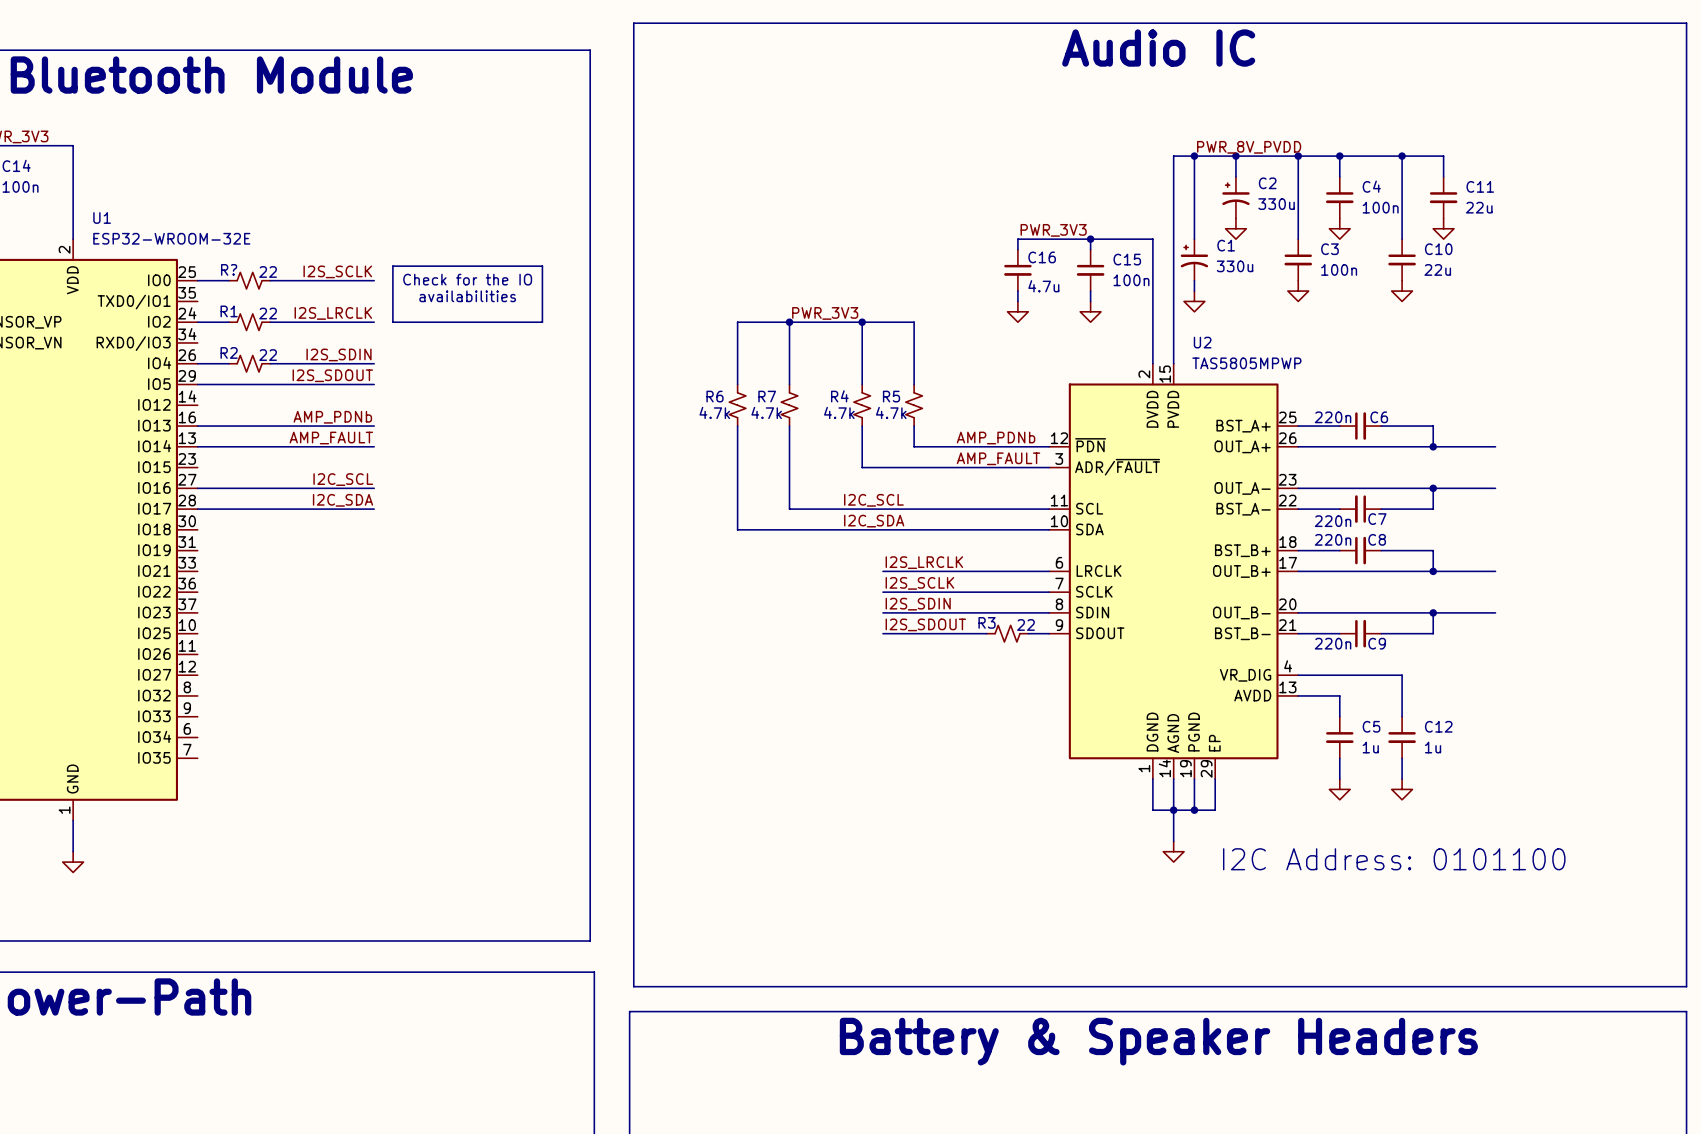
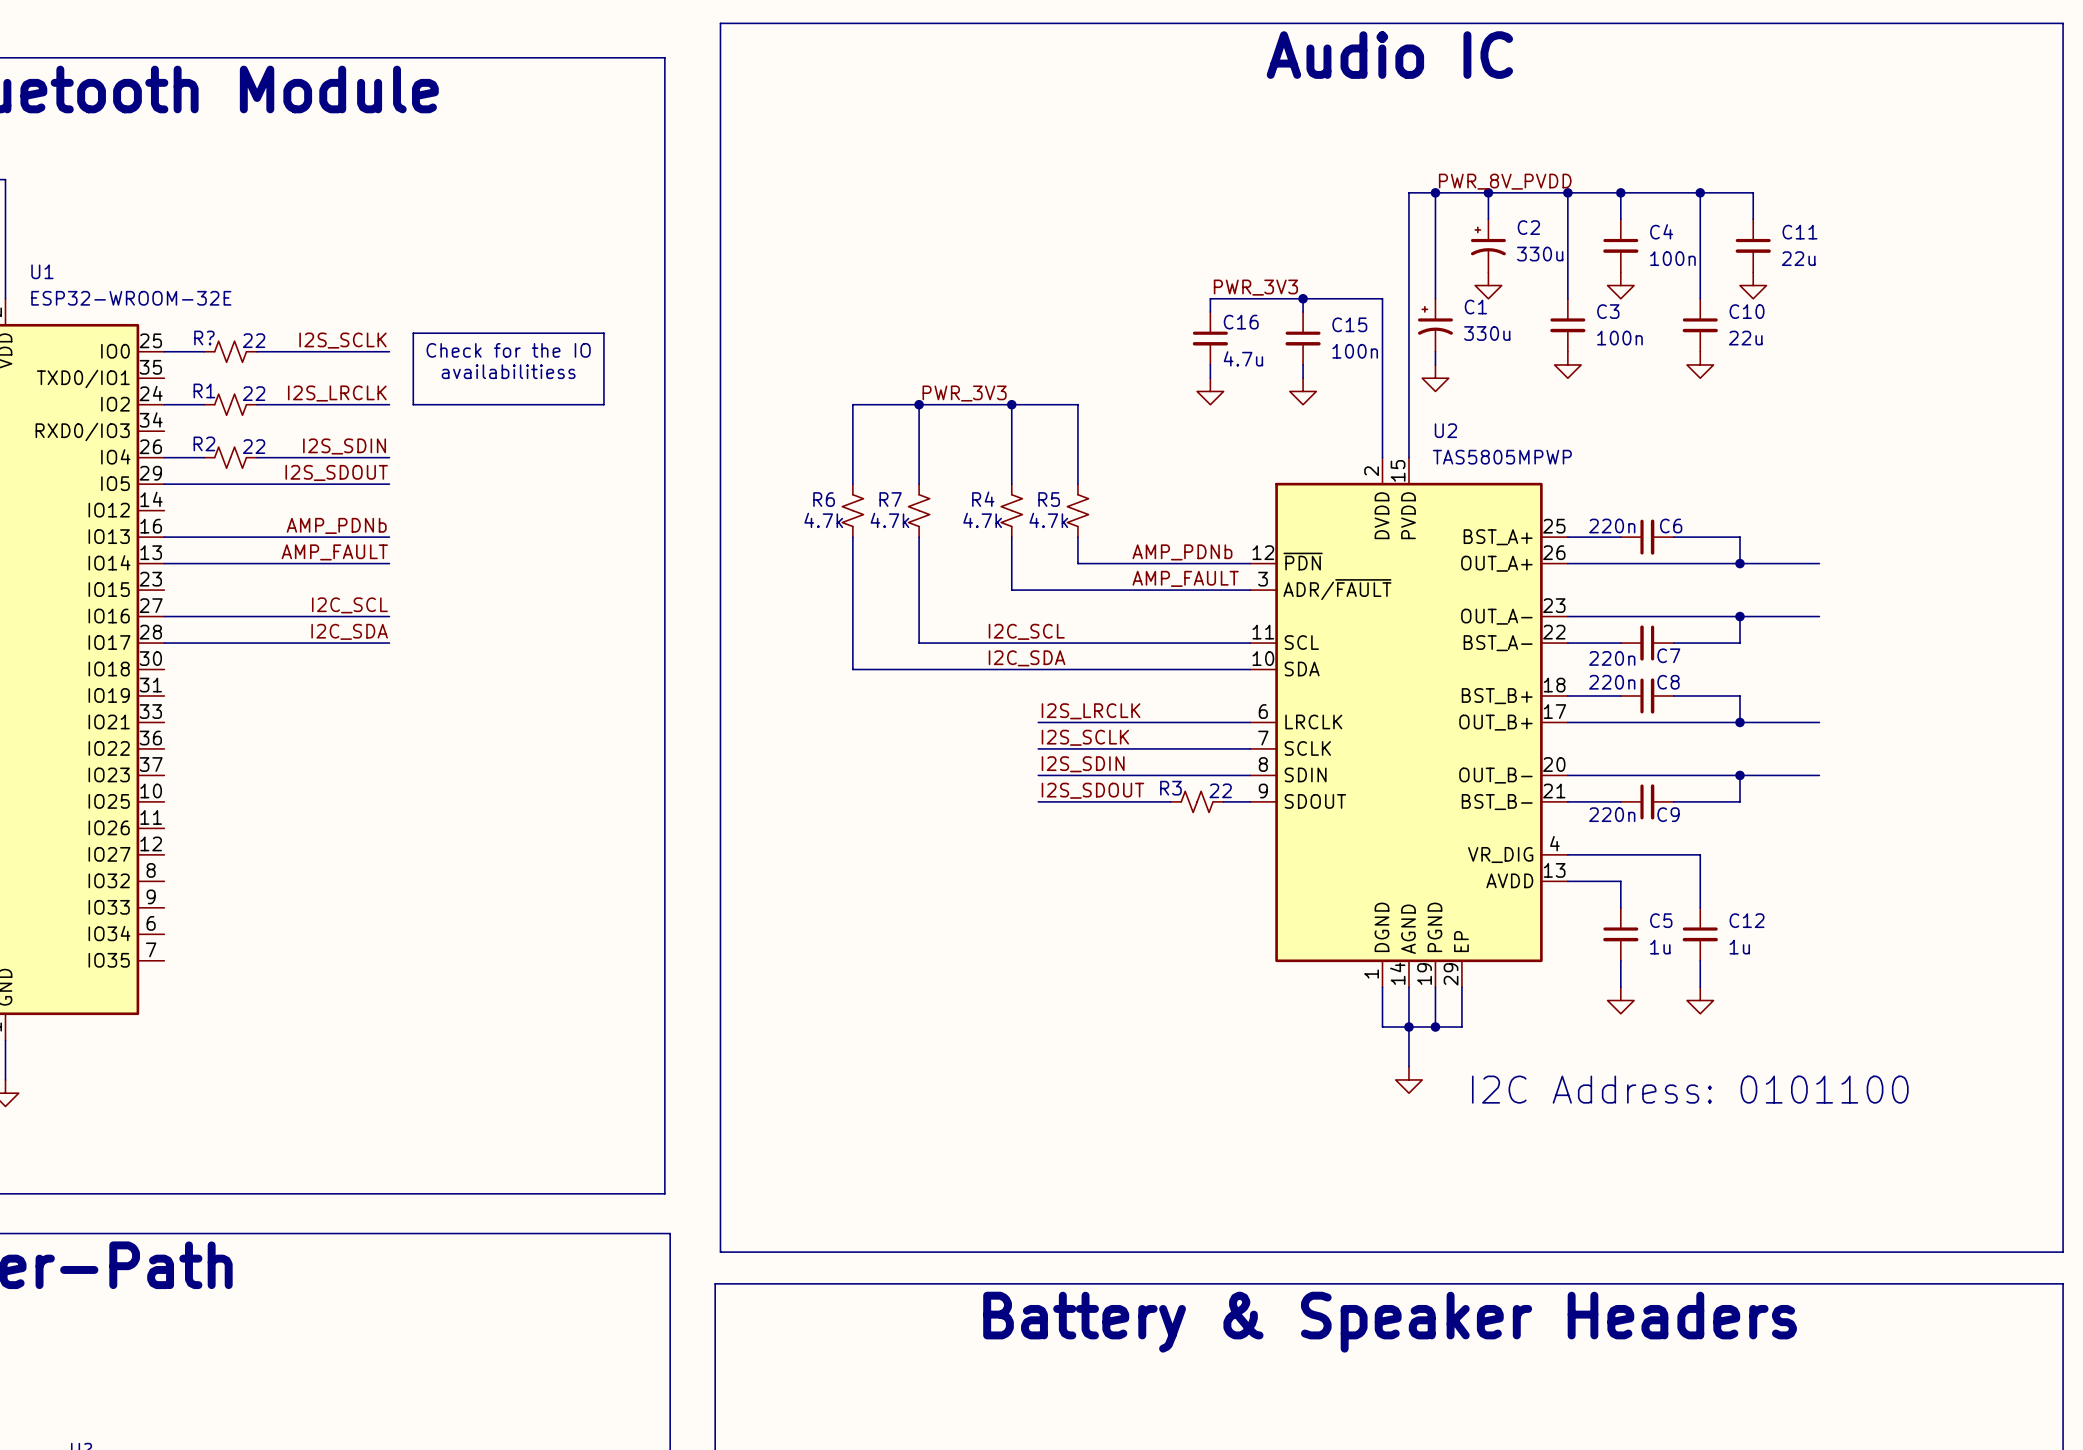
text: availabilities (467, 296) -> availabilitiess (508, 371)

